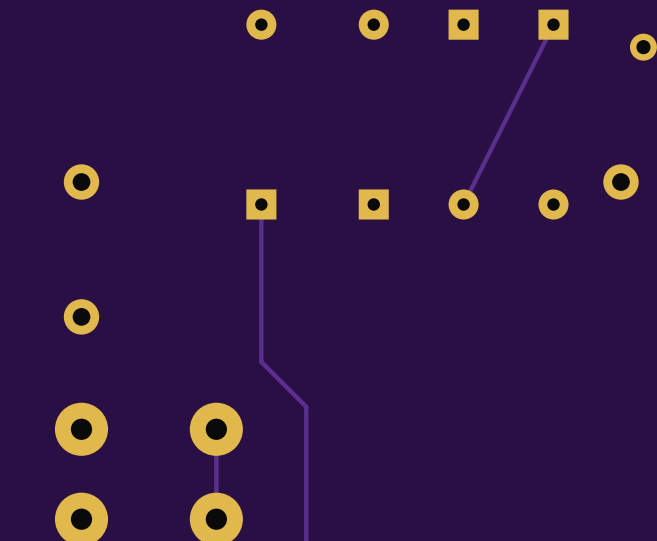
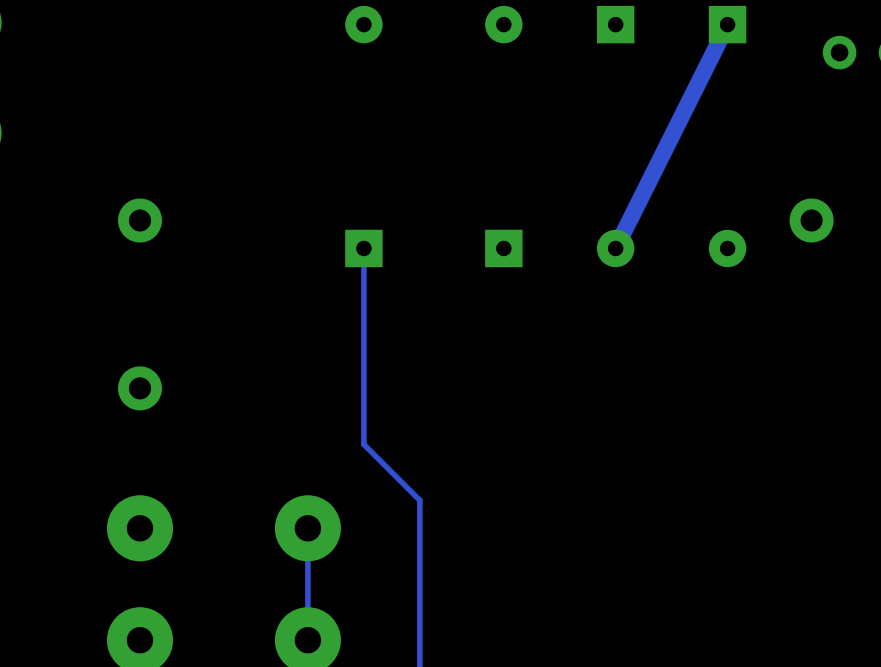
track width: thin (553, 24) (463, 204) -> thick (727, 24) (615, 248)

